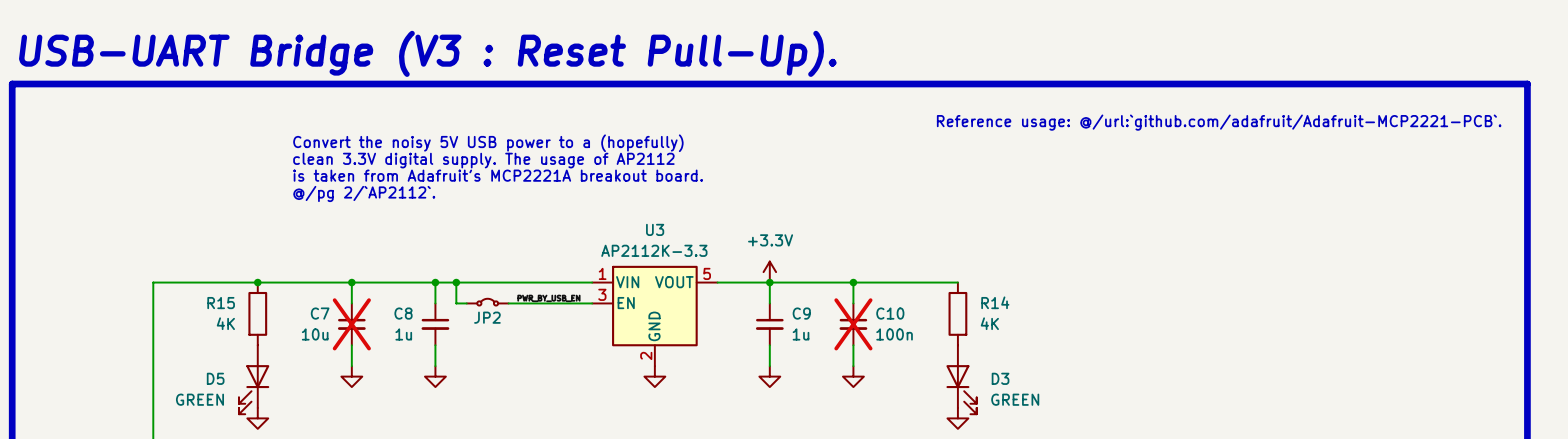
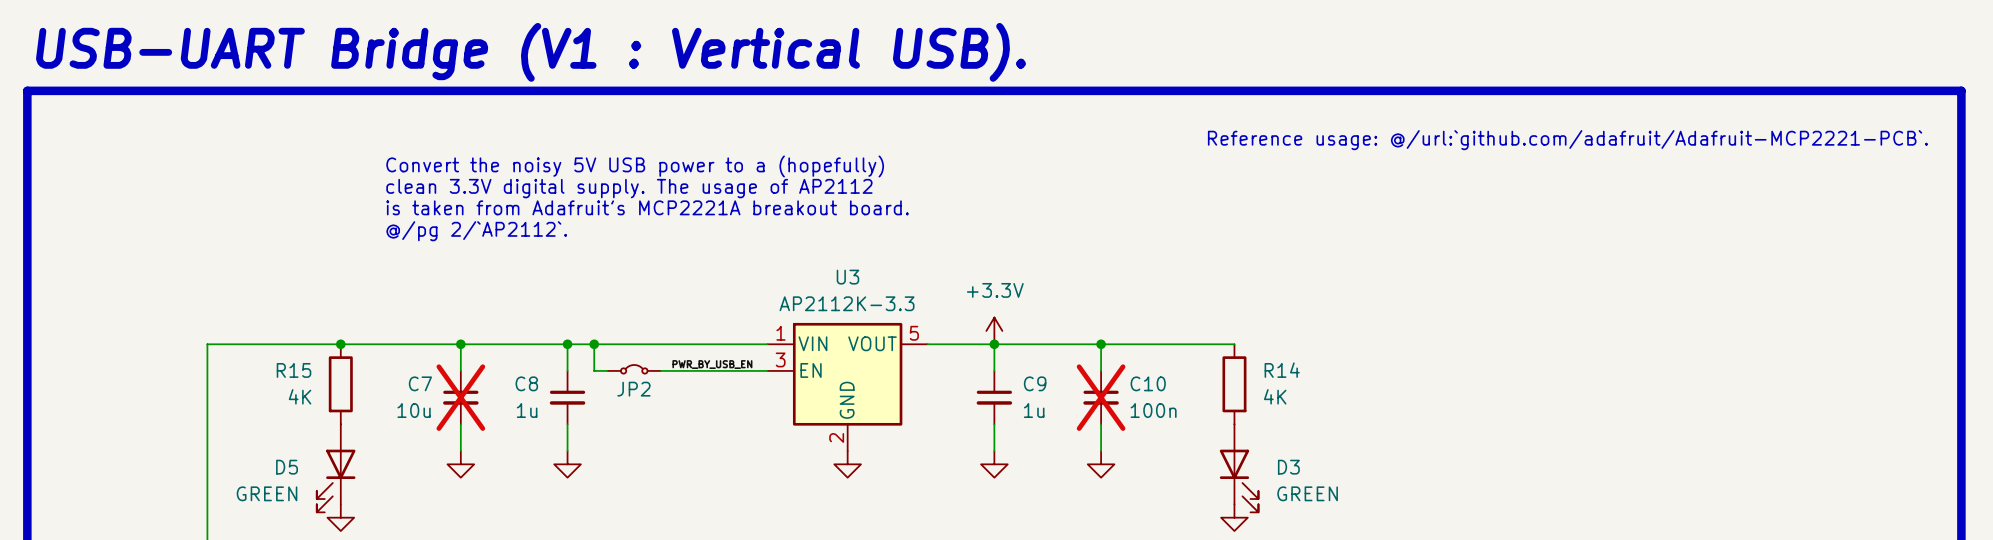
text: USB-UART Bridge (V3 : Reset Pull-Up). (427, 53) -> USB-UART Bridge (V1 : Vertical USB). (531, 52)

